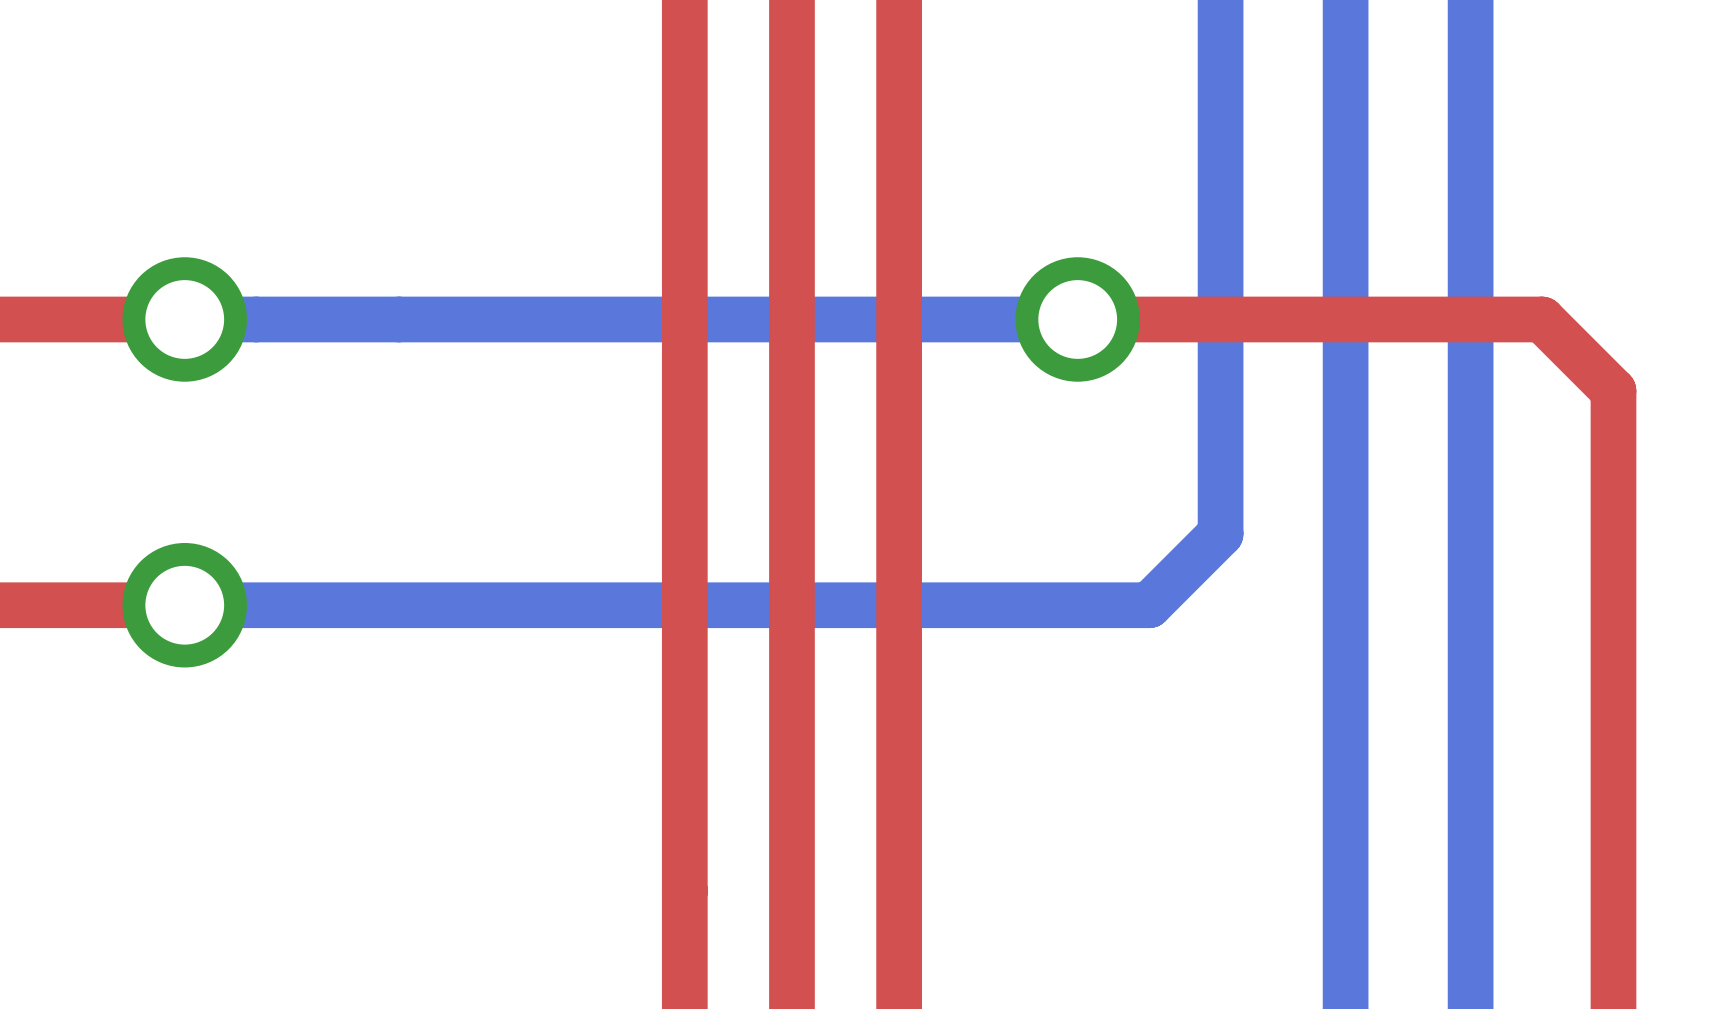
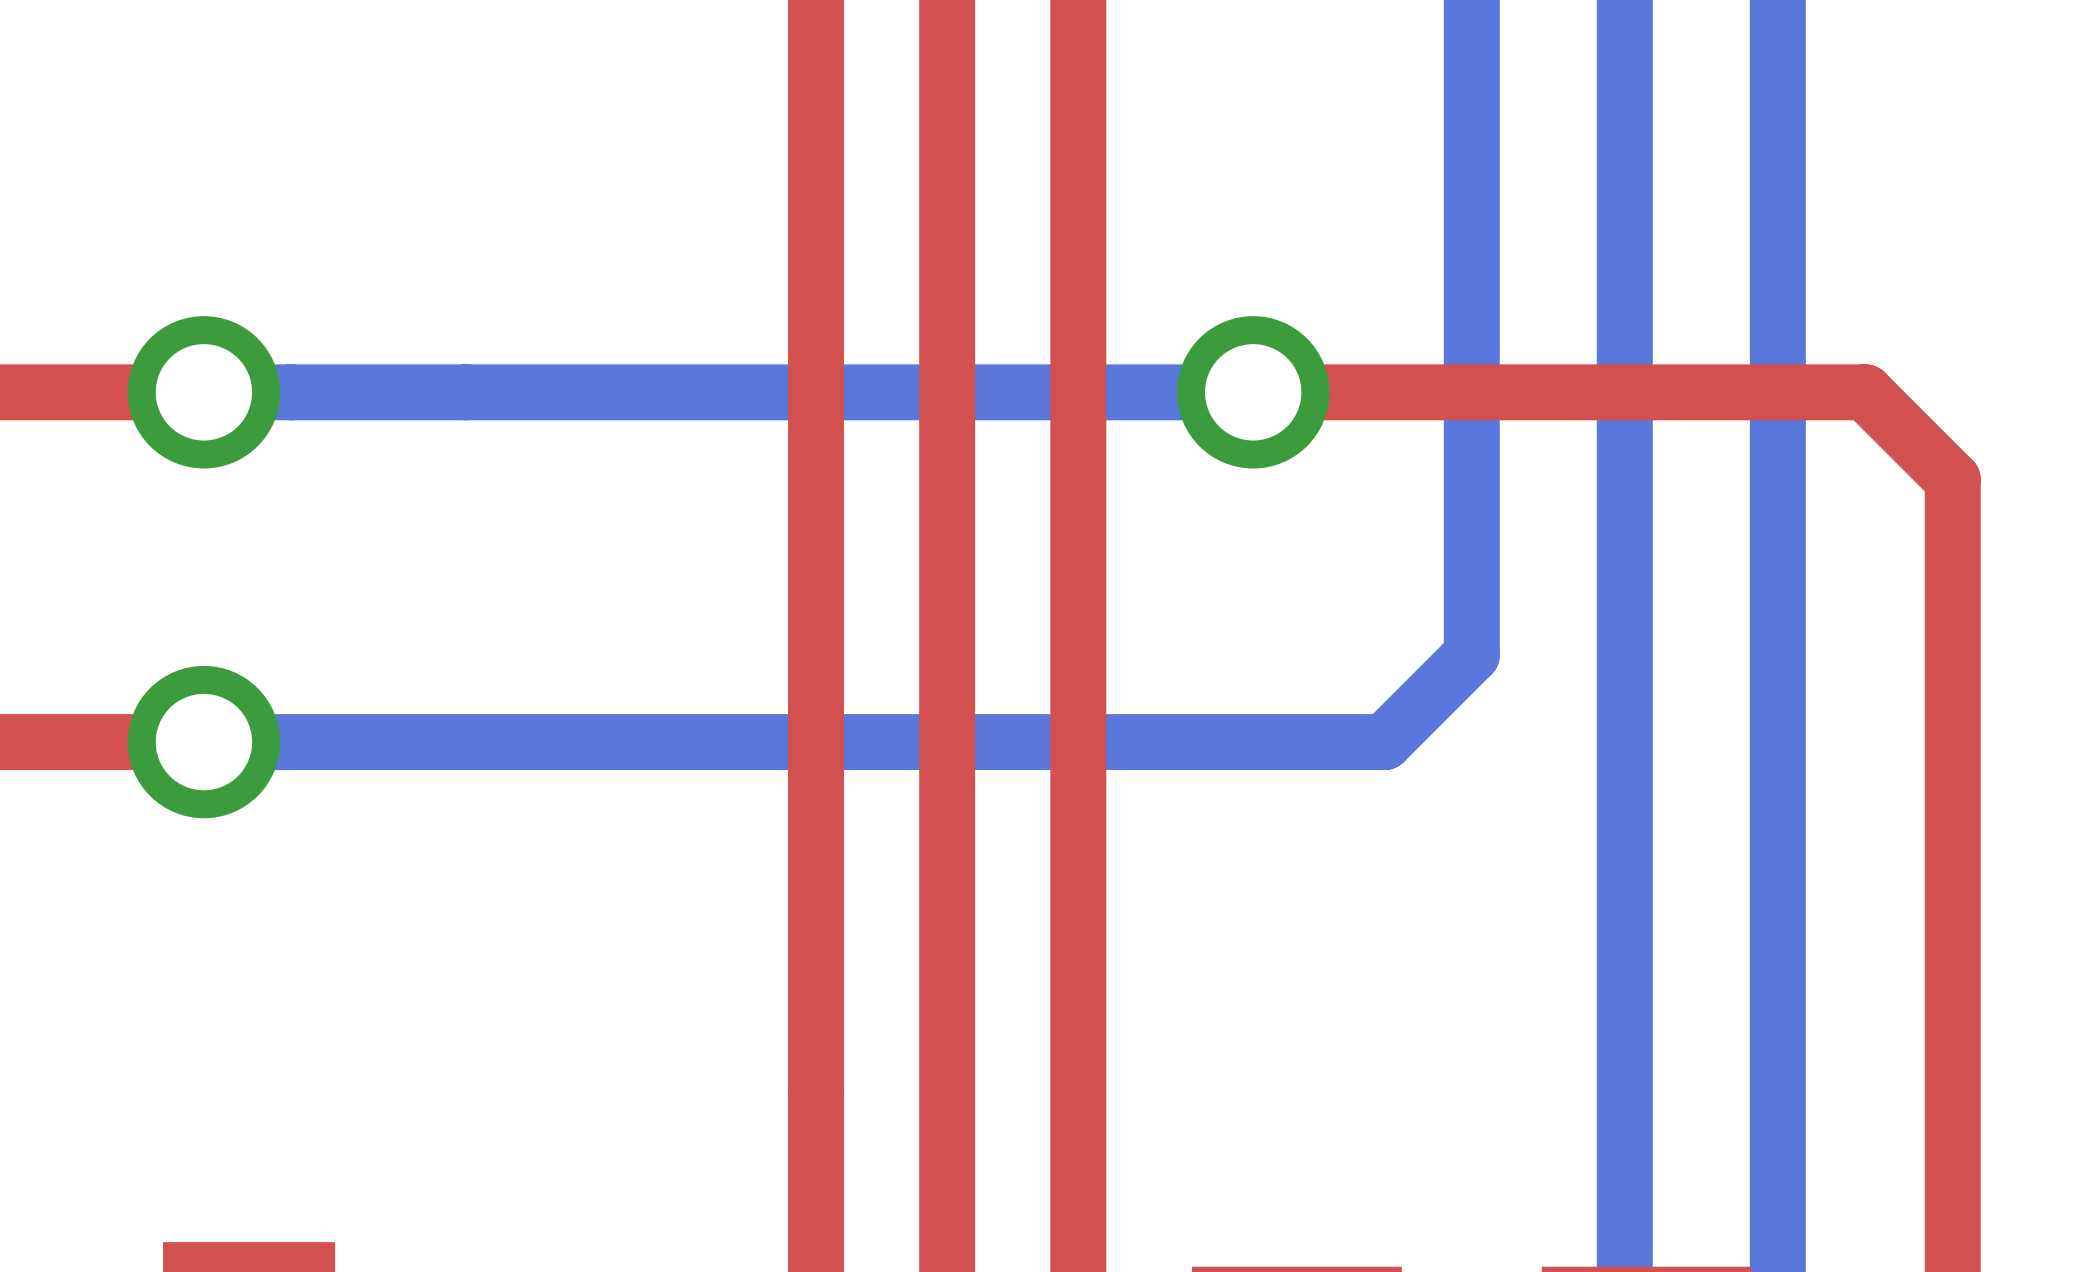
via position: (1077, 319) -> (1253, 392)

